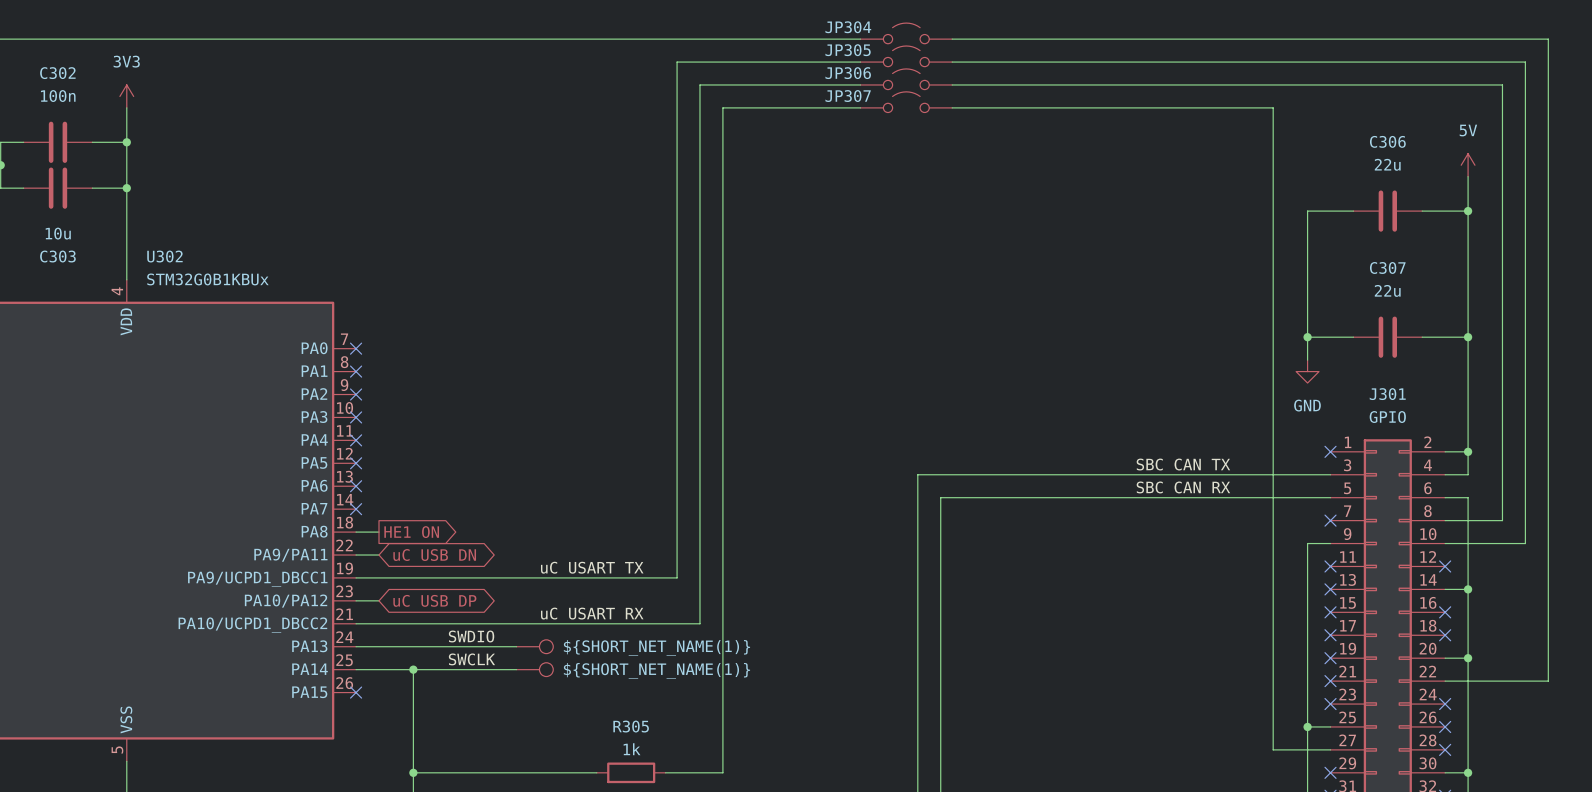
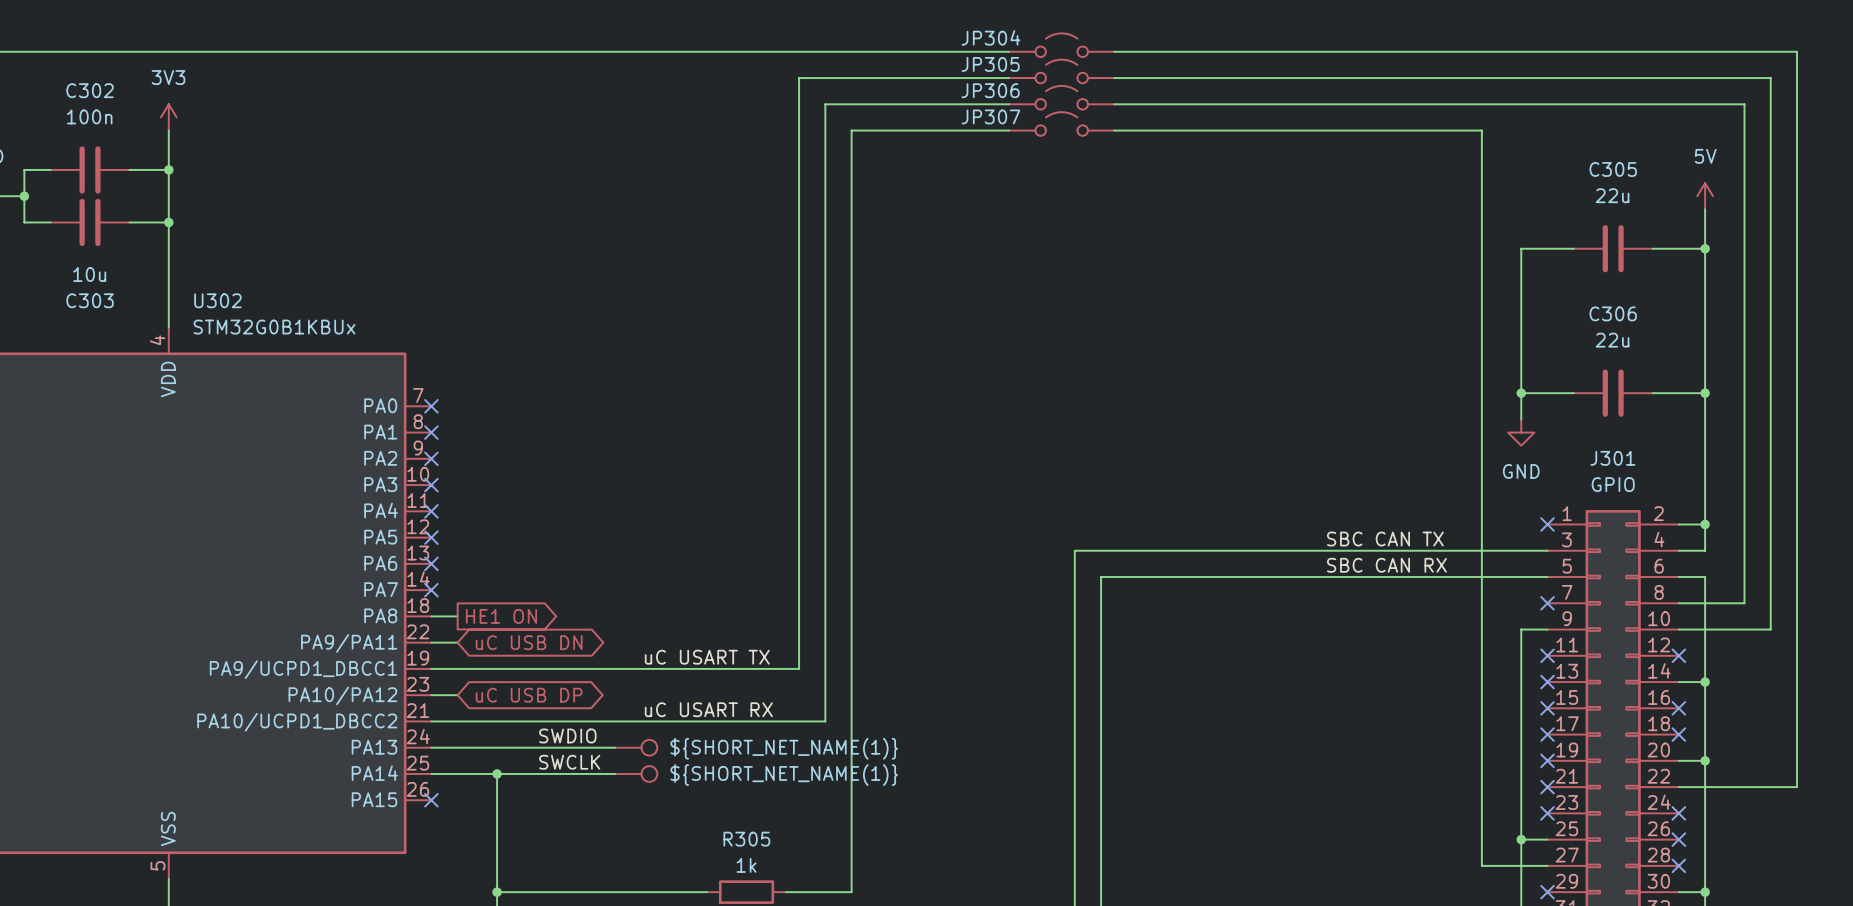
C306 name: C306 (1387, 141) -> C305 (1613, 169)
C307 name: C307 (1387, 267) -> C306 (1613, 313)

